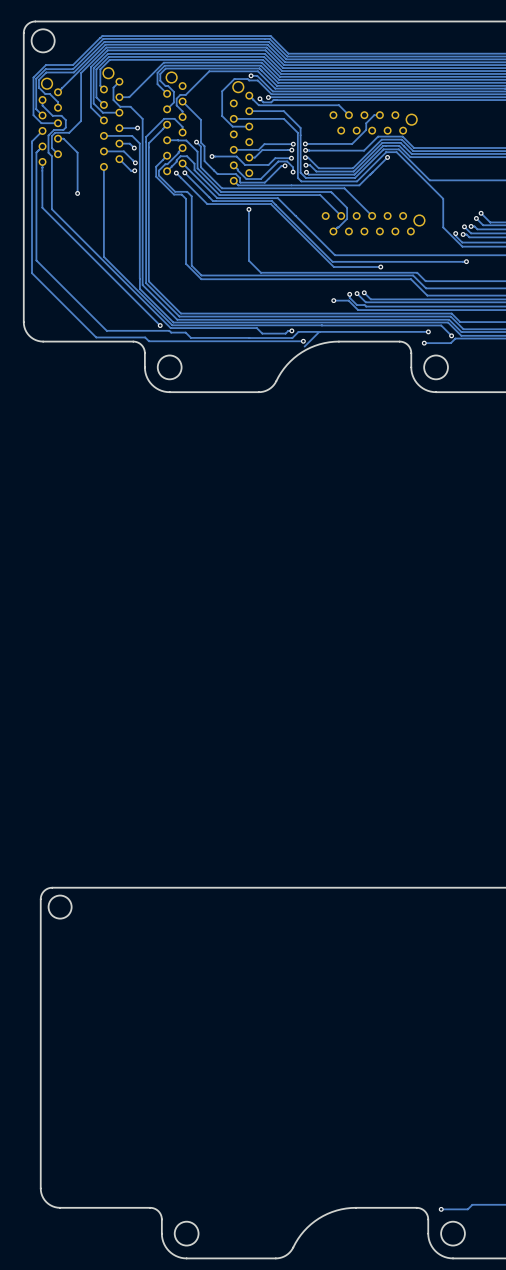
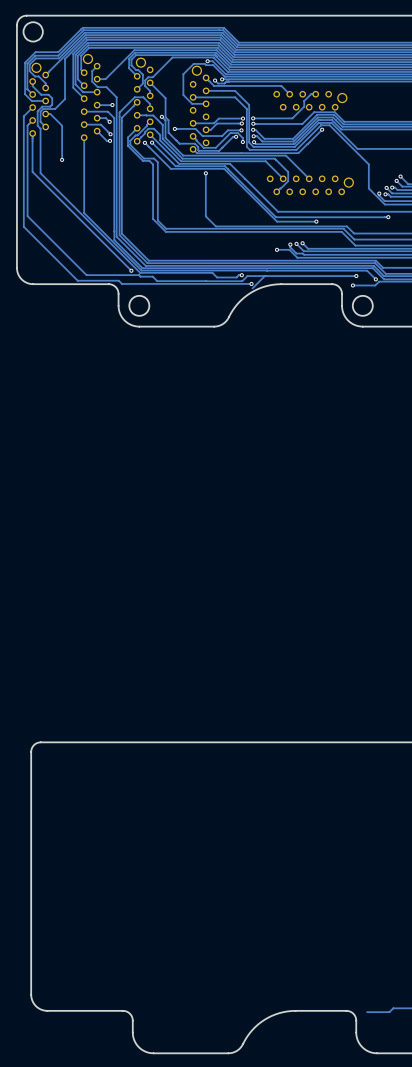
round board edge: [47, 894, 73, 920] -> none
via: (441, 1209) -> none
round board edge: [174, 1221, 200, 1247] -> none
round board edge: [440, 1221, 466, 1247] -> none

